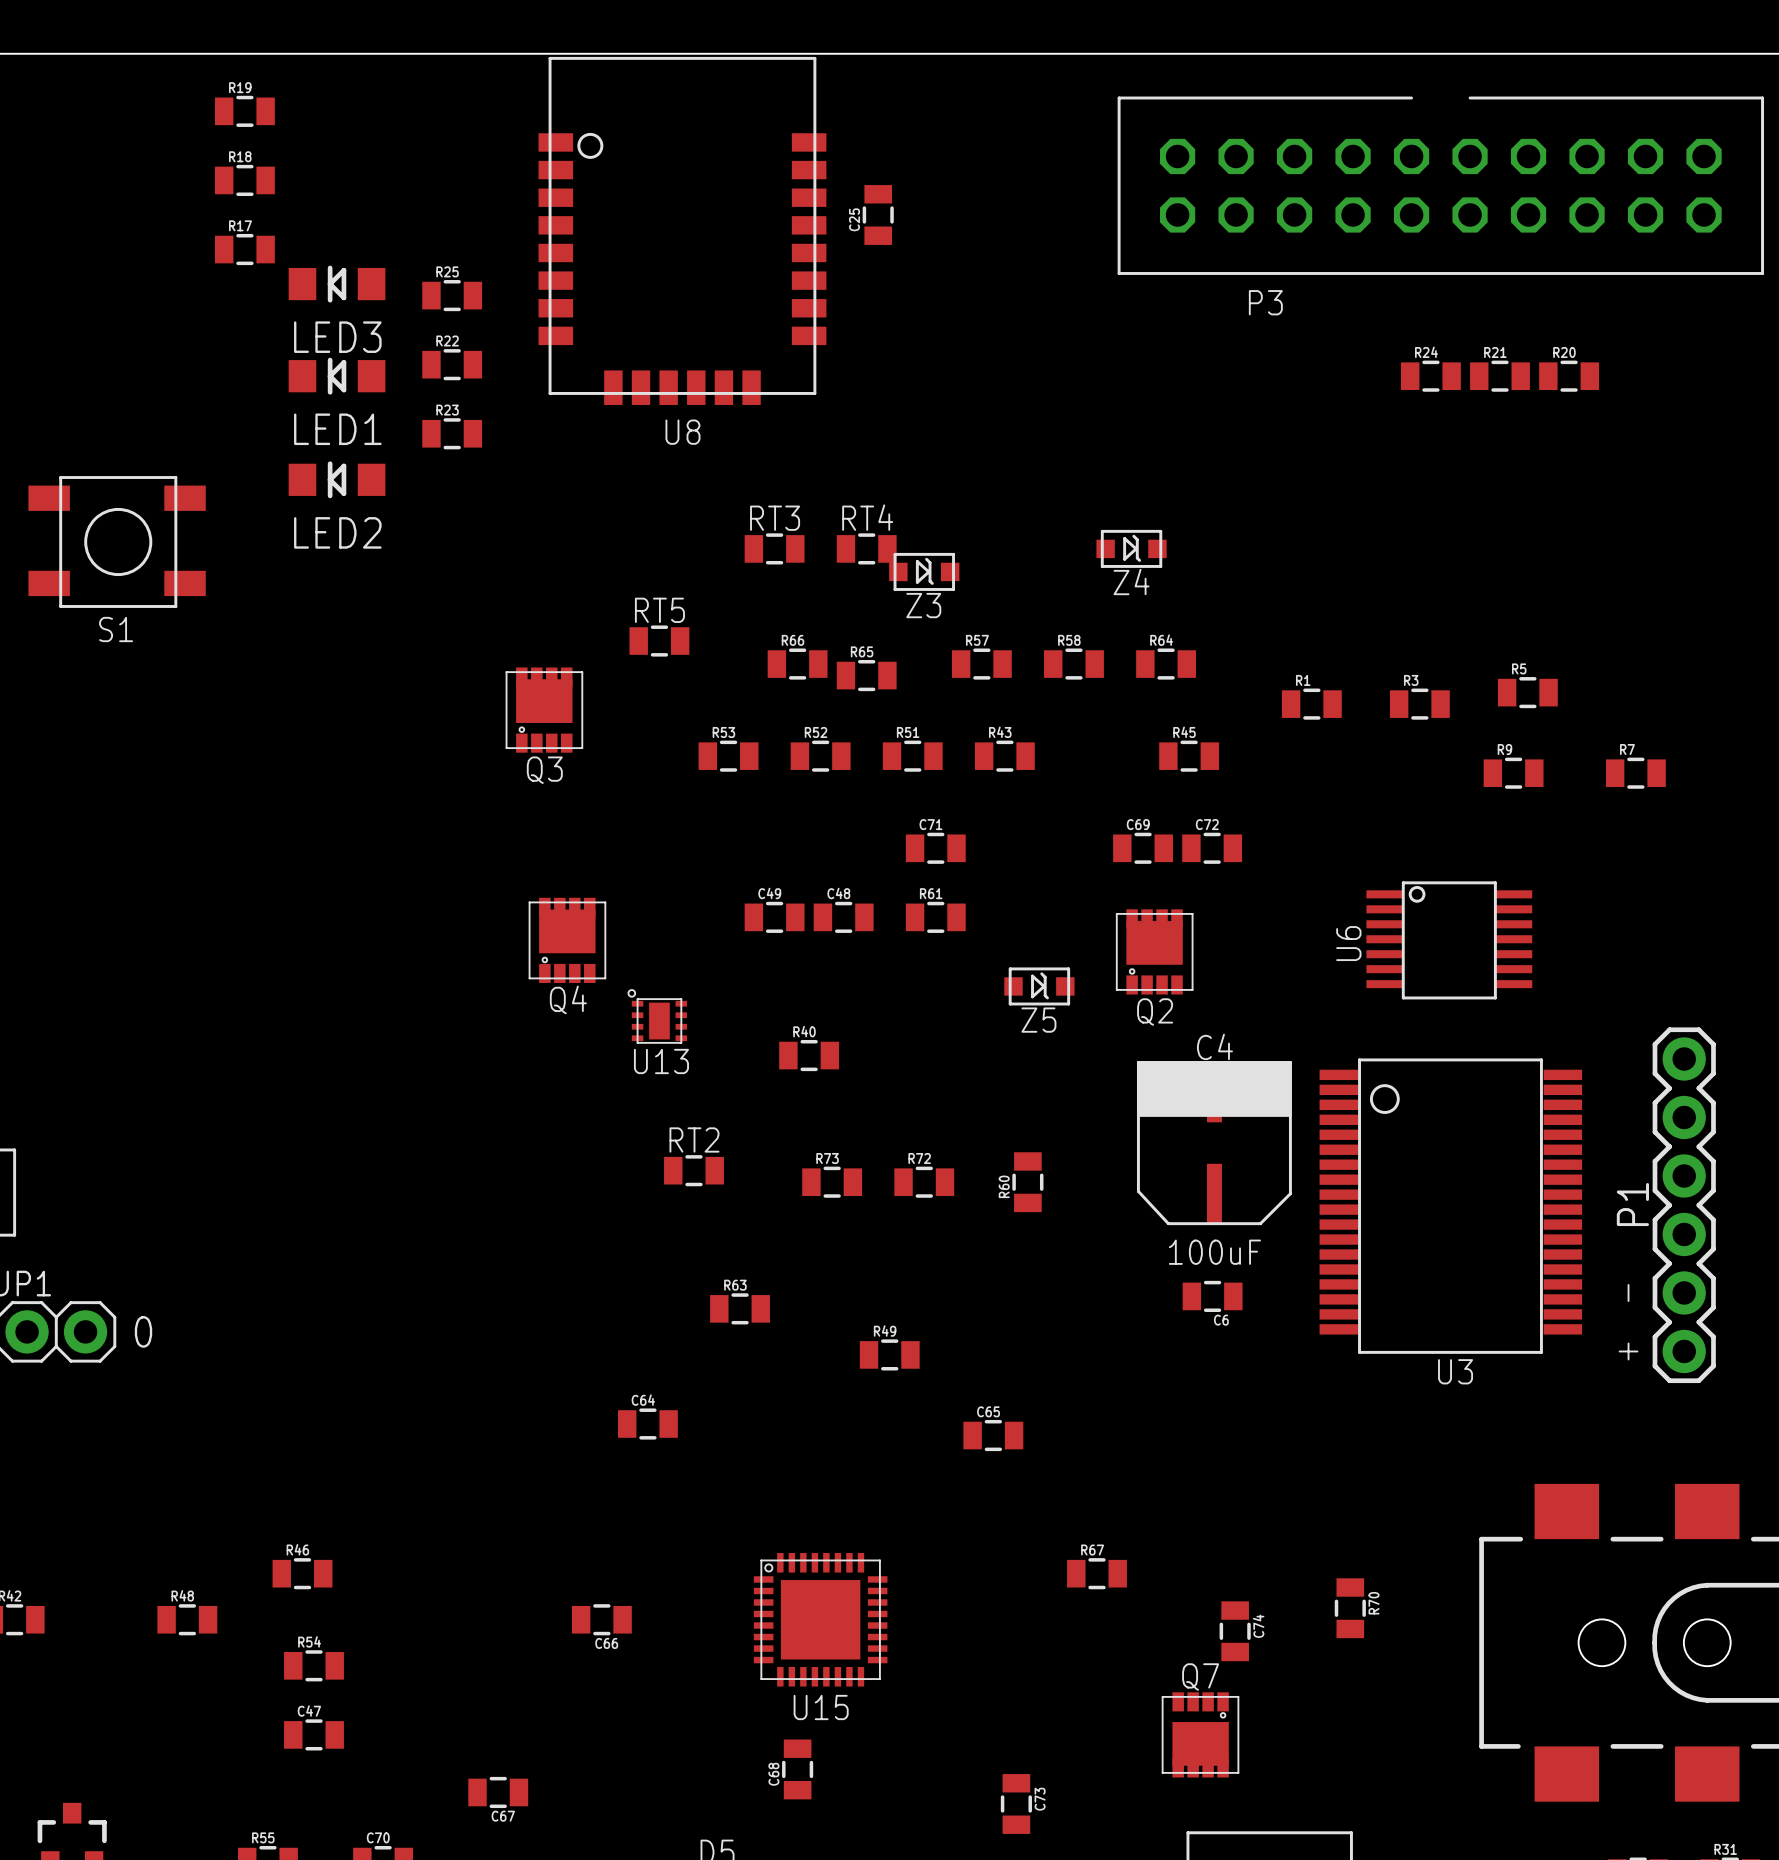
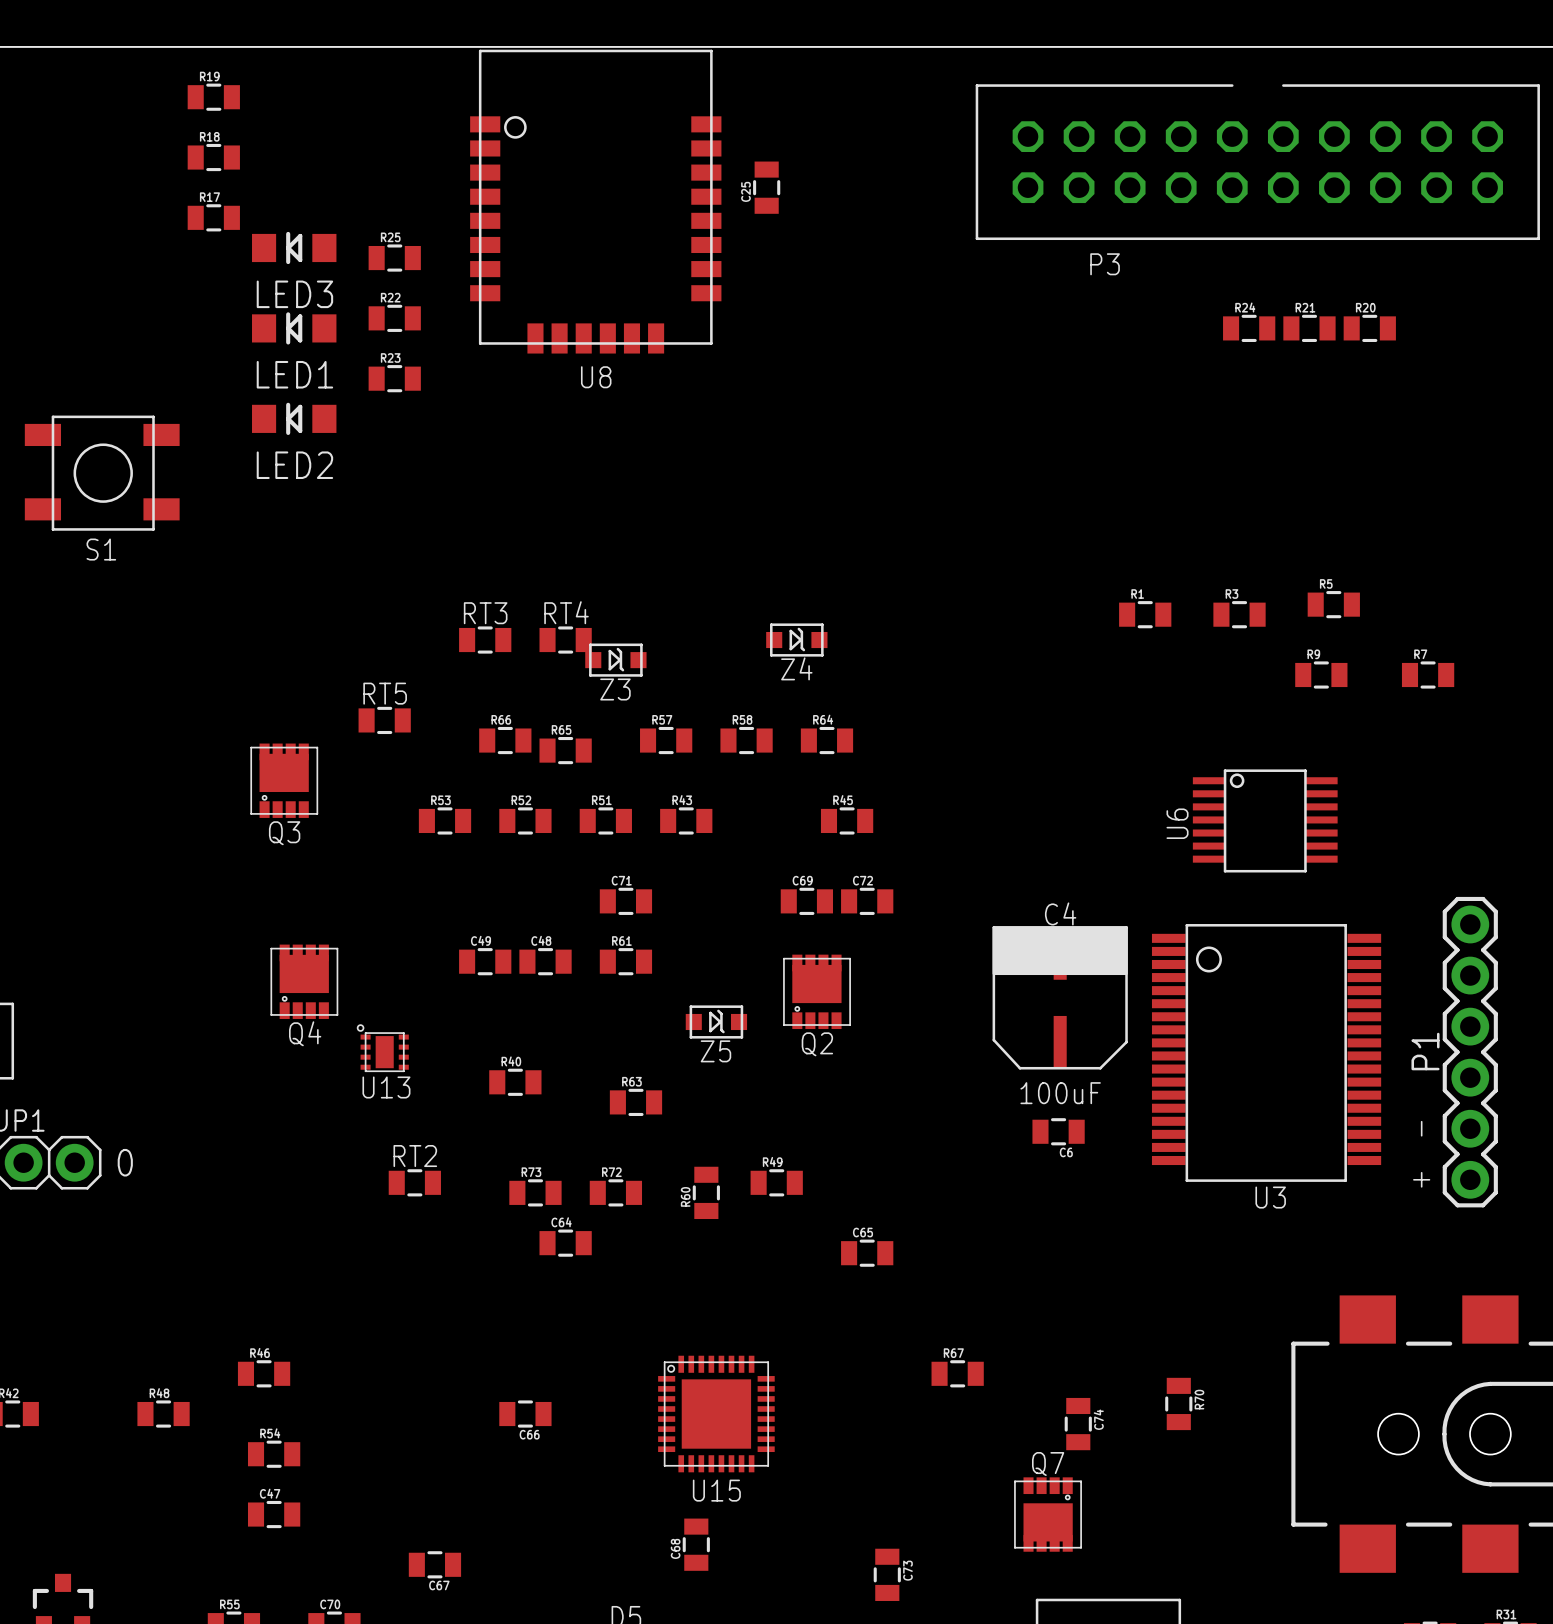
RT3 position: (774, 548) -> (485, 640)
RT4 position: (866, 548) -> (565, 640)
Z4 position: (1131, 548) -> (796, 640)
Z3 position: (924, 571) -> (615, 660)
RT5 position: (659, 641) -> (384, 720)
R66 position: (797, 664) -> (505, 740)
R57 position: (981, 664) -> (666, 740)
R58 position: (1073, 664) -> (746, 740)
R64 position: (1166, 664) -> (826, 740)
R65 position: (866, 675) -> (565, 750)
Q3 position: (544, 710) -> (284, 780)
R53 position: (728, 756) -> (445, 820)
R52 position: (820, 756) -> (525, 820)
R51 position: (912, 756) -> (605, 820)
R43 position: (1004, 756) -> (686, 820)
R45 position: (1189, 756) -> (847, 820)
C71 position: (935, 848) -> (625, 901)
C69 position: (1143, 848) -> (806, 901)
C72 position: (1212, 848) -> (867, 901)
C49 position: (774, 917) -> (485, 961)
C48 position: (843, 917) -> (545, 961)
R61 position: (935, 917) -> (625, 961)
Q4 position: (567, 940) -> (304, 981)
Q2 position: (1154, 951) -> (817, 991)
Z5 position: (1039, 986) -> (716, 1021)
U13 position: (657, 1016) -> (382, 1048)
R40 position: (809, 1055) -> (515, 1082)
RT2 position: (693, 1170) -> (414, 1182)
R73 position: (832, 1182) -> (535, 1192)
R72 position: (924, 1182) -> (615, 1192)
R60 position: (1027, 1182) -> (706, 1192)
R63 position: (740, 1308) -> (635, 1102)

